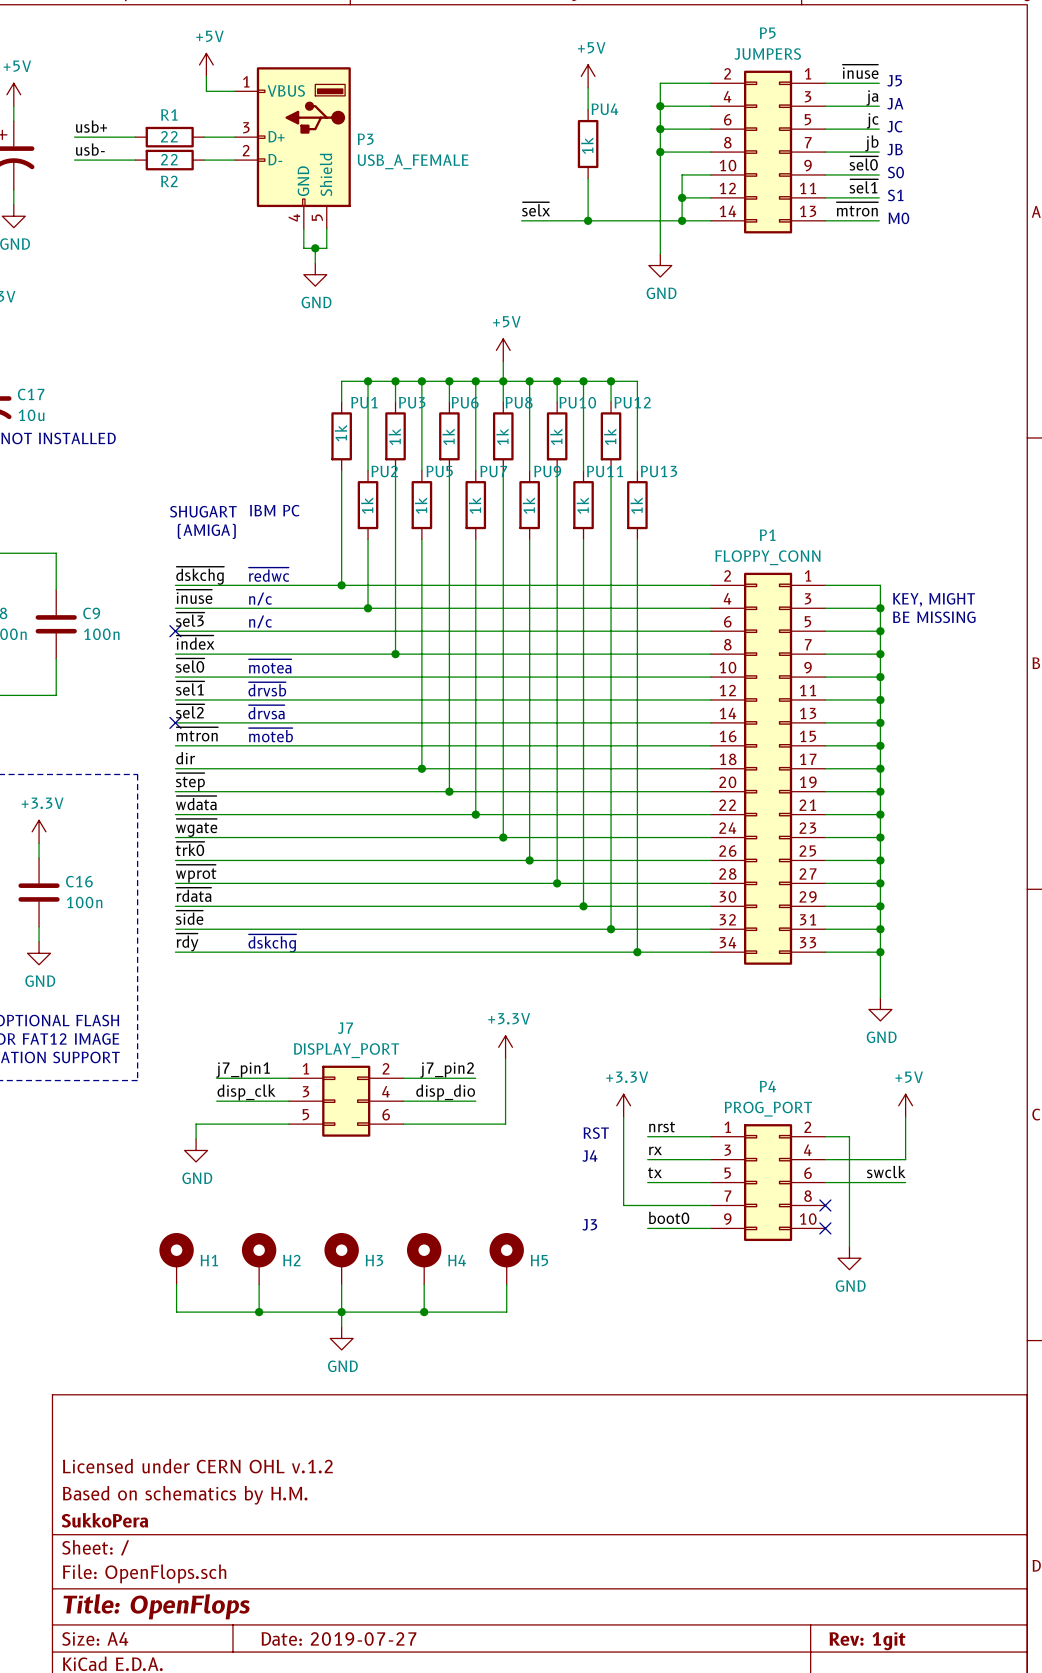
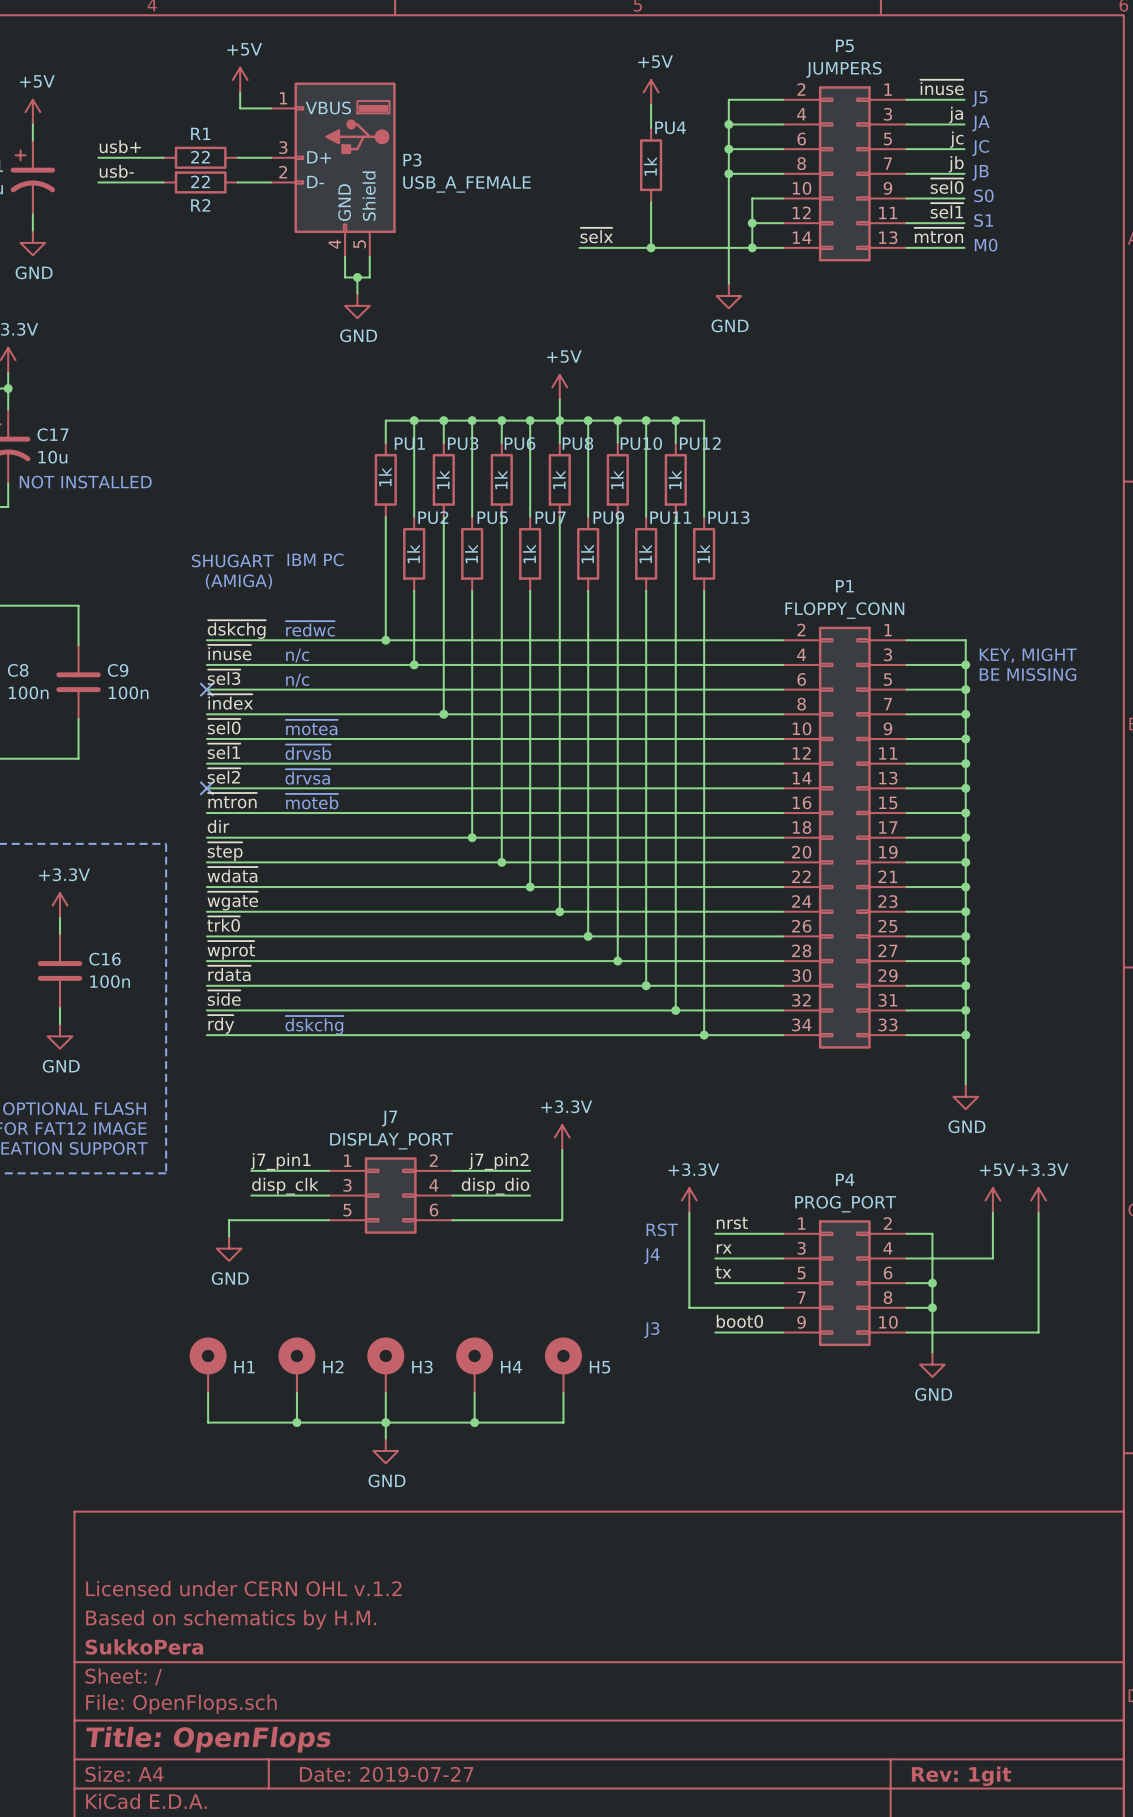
power symbol: none -> +3.3V (1038, 1200)
wire: none -> (1038, 1212) (1038, 1332) (906, 1332)
label: swclk (886, 1172) -> none
wire: (849, 1182) (905, 1182) -> none
junction: none -> (932, 1283)
wire: none -> (906, 1307) (932, 1307)
no-connect mark: (825, 1205) -> none
junction: none -> (932, 1307)
no-connect mark: (825, 1228) -> none

